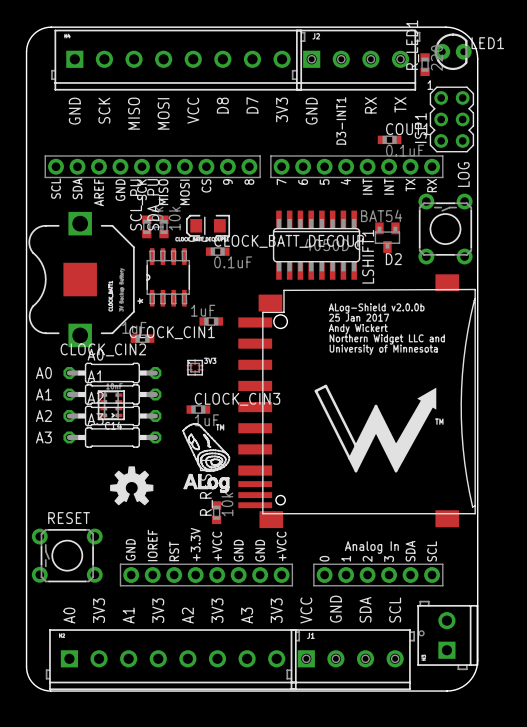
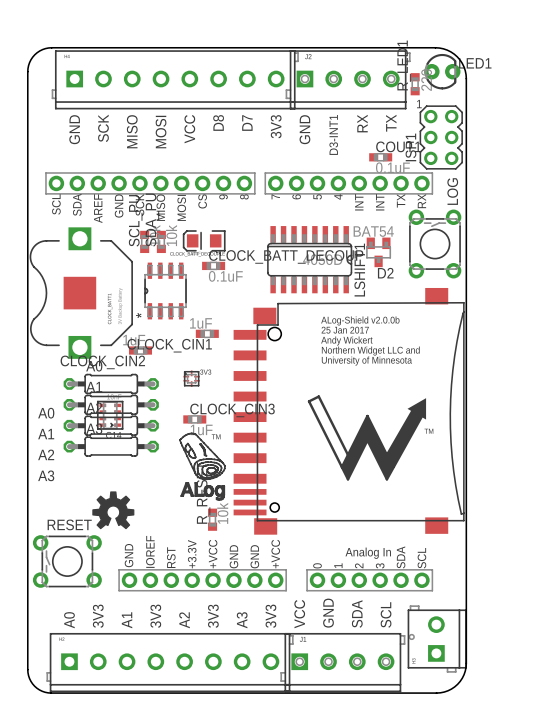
text position: A0 (43, 373) -> A0 (46, 413)
text position: A1 (43, 394) -> A1 (46, 434)
text position: A2 (43, 415) -> A2 (46, 454)
text position: A3 (43, 437) -> A3 (46, 475)
drawing position: (131, 485) -> (113, 510)

